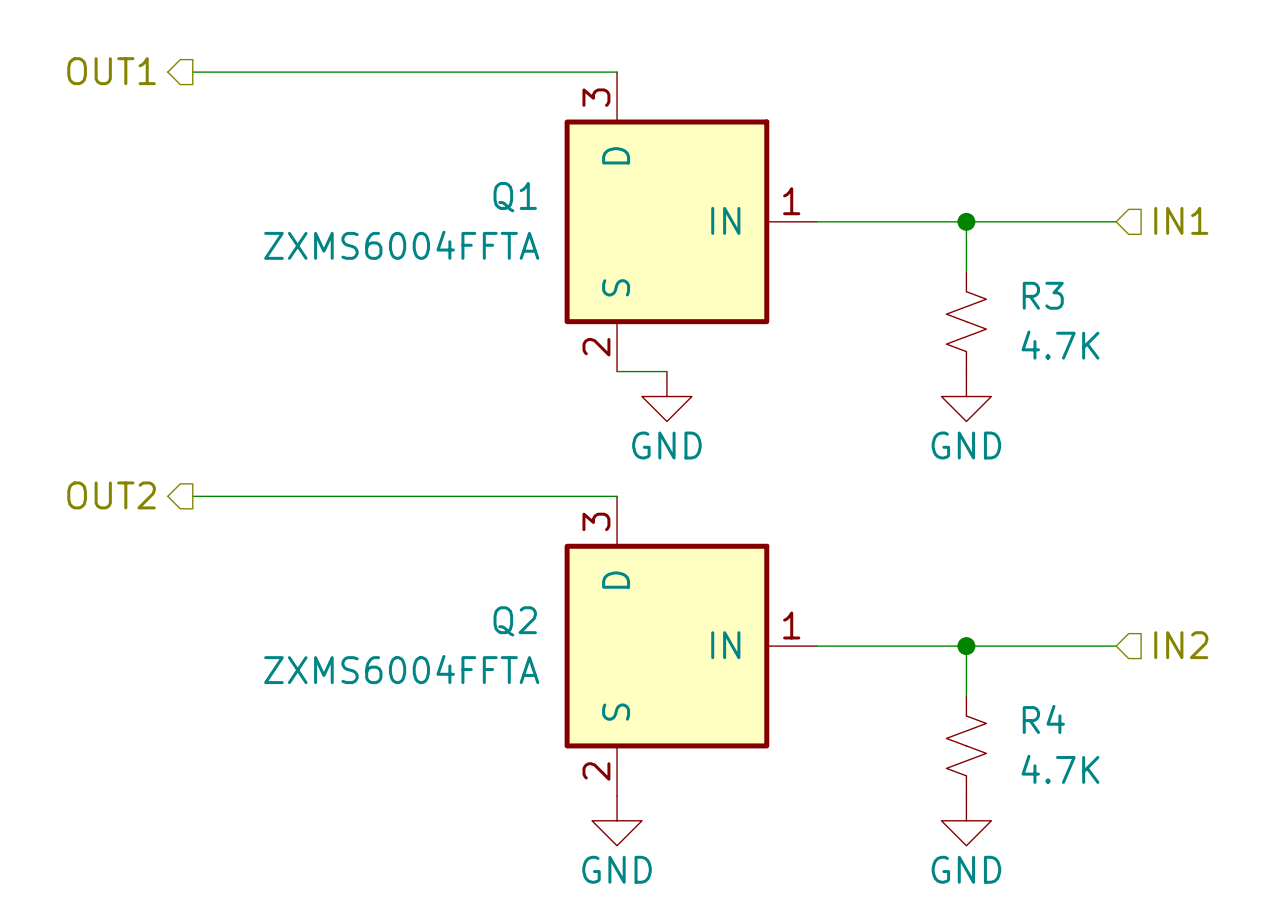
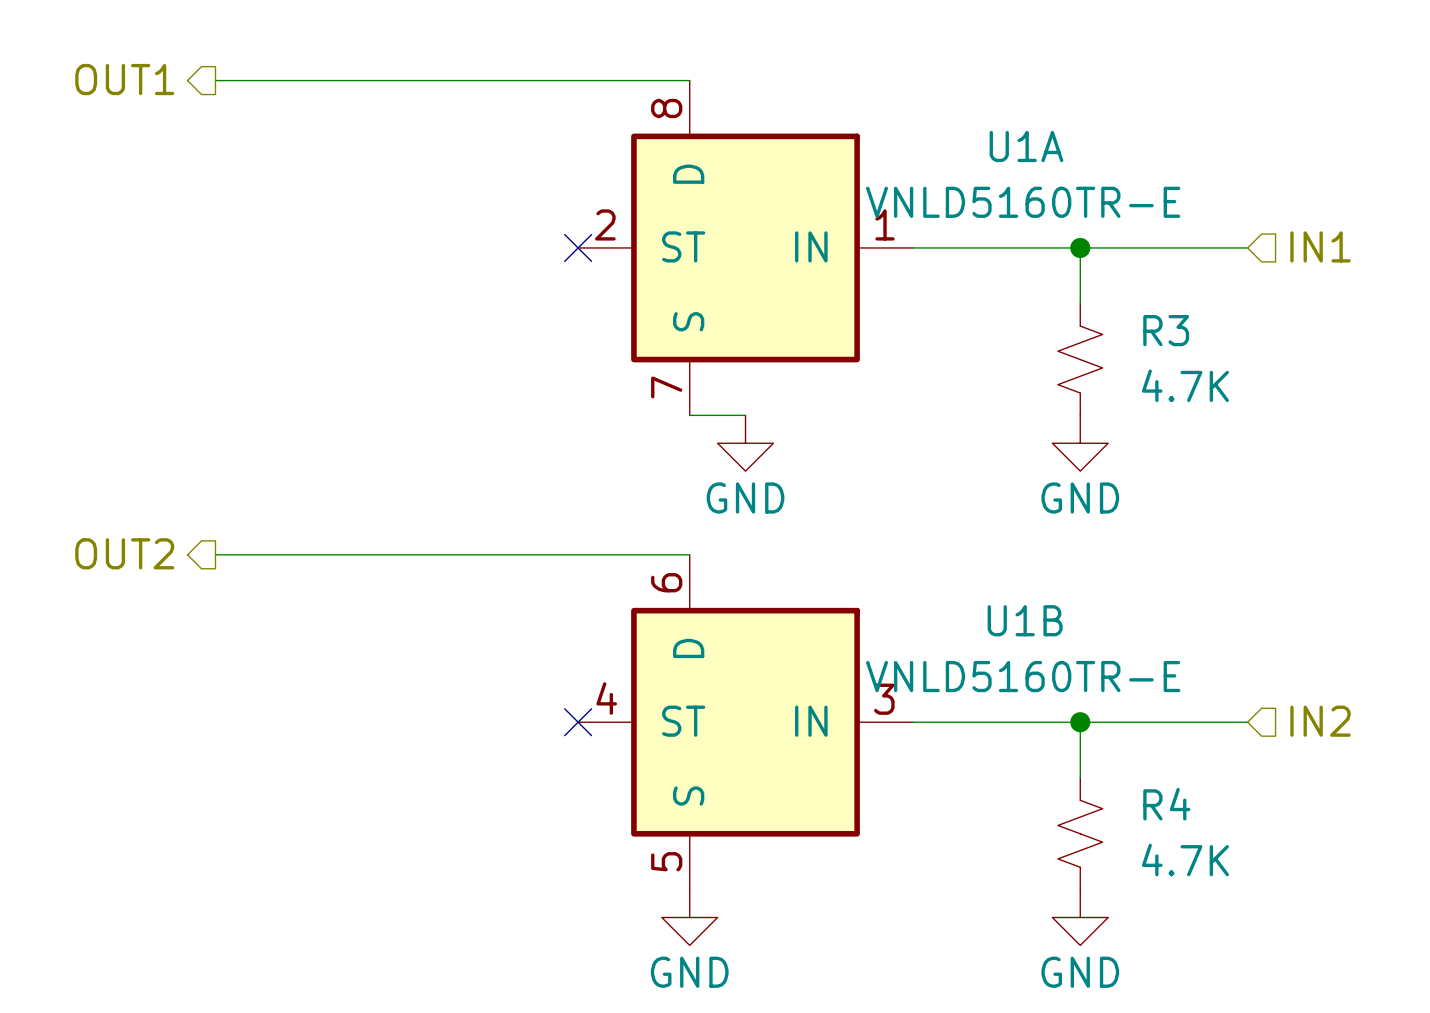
no-connect mark: none -> (578, 247)
U1A: none -> VNLD5160TR-E (745, 247)
Q1: ZXMS6004FFTA (690, 221) -> none
no-connect mark: none -> (578, 722)
U1B: none -> VNLD5160TR-E (745, 722)
Q2: ZXMS6004FFTA (690, 646) -> none

